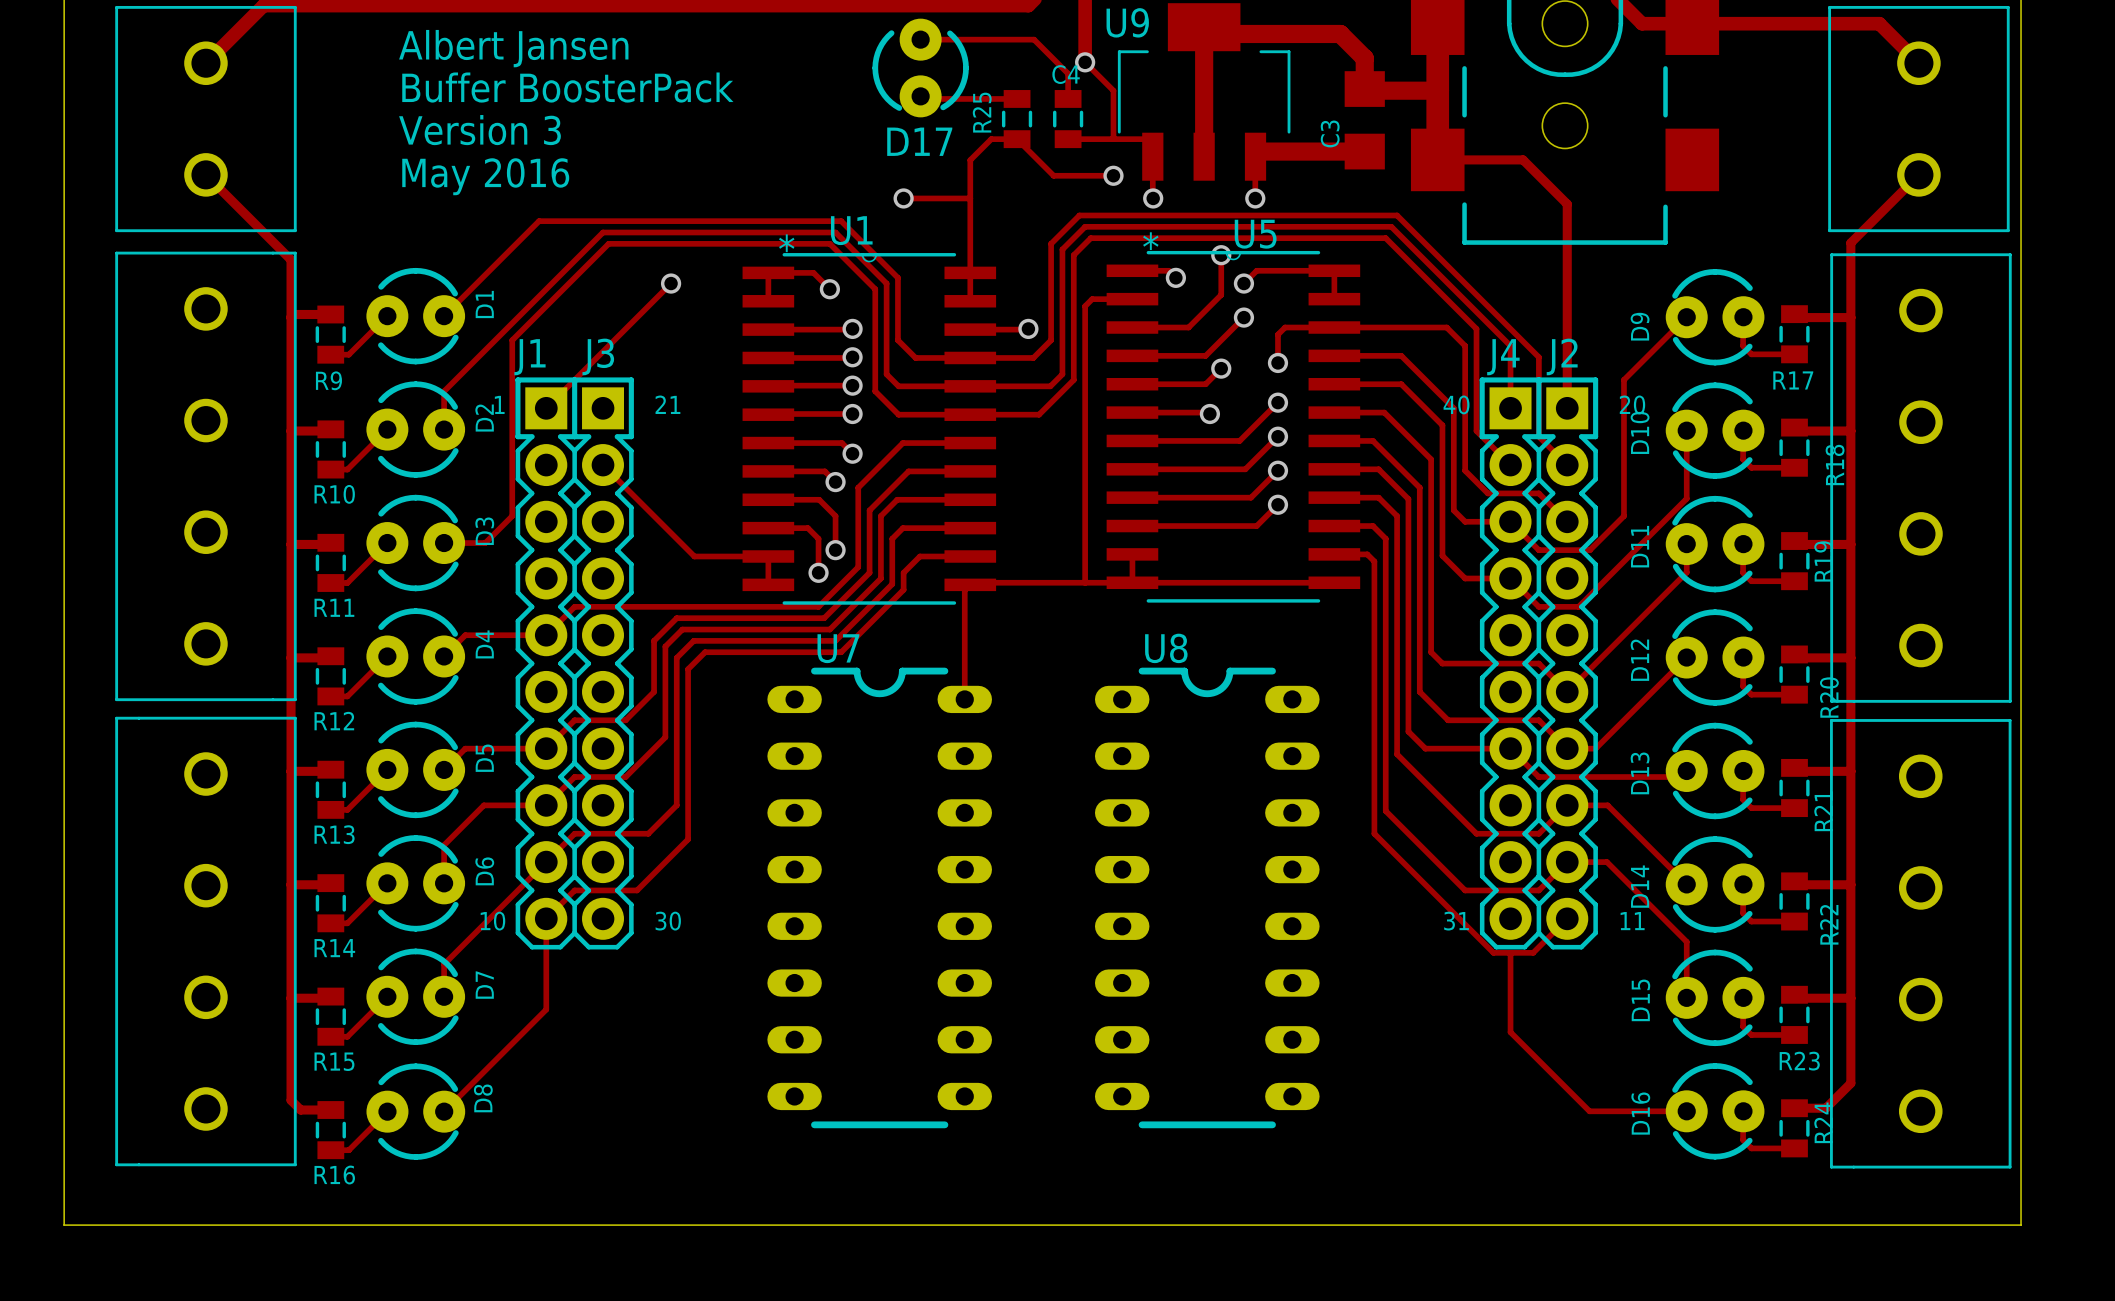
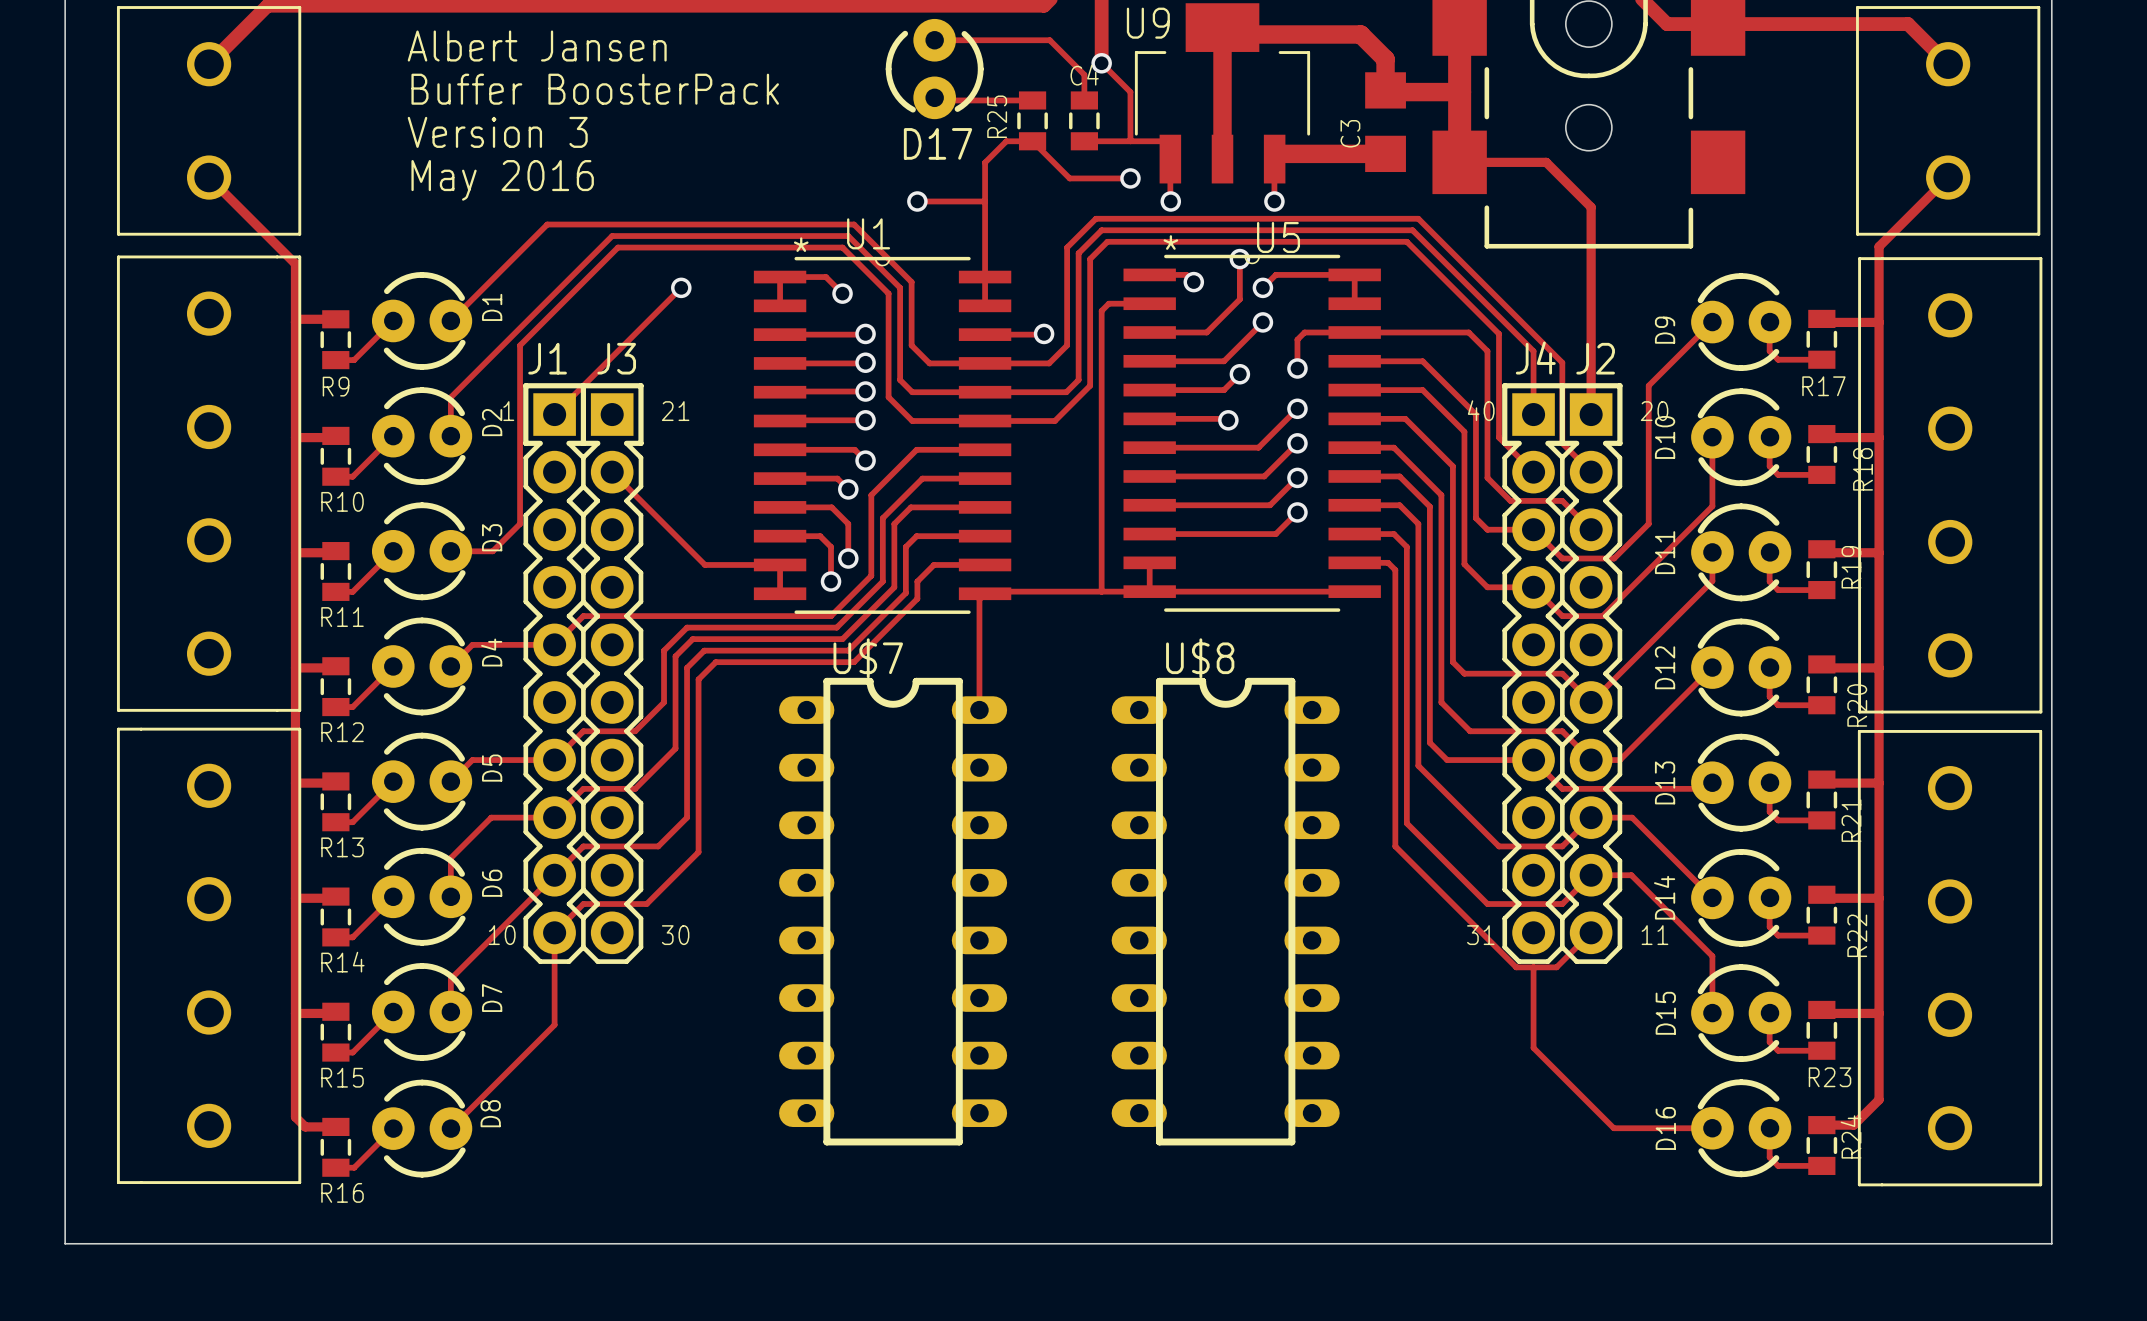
U7: (879, 897) -> none
U$7: none -> (893, 911)
U8: (1207, 897) -> none
U$8: none -> (1225, 911)

